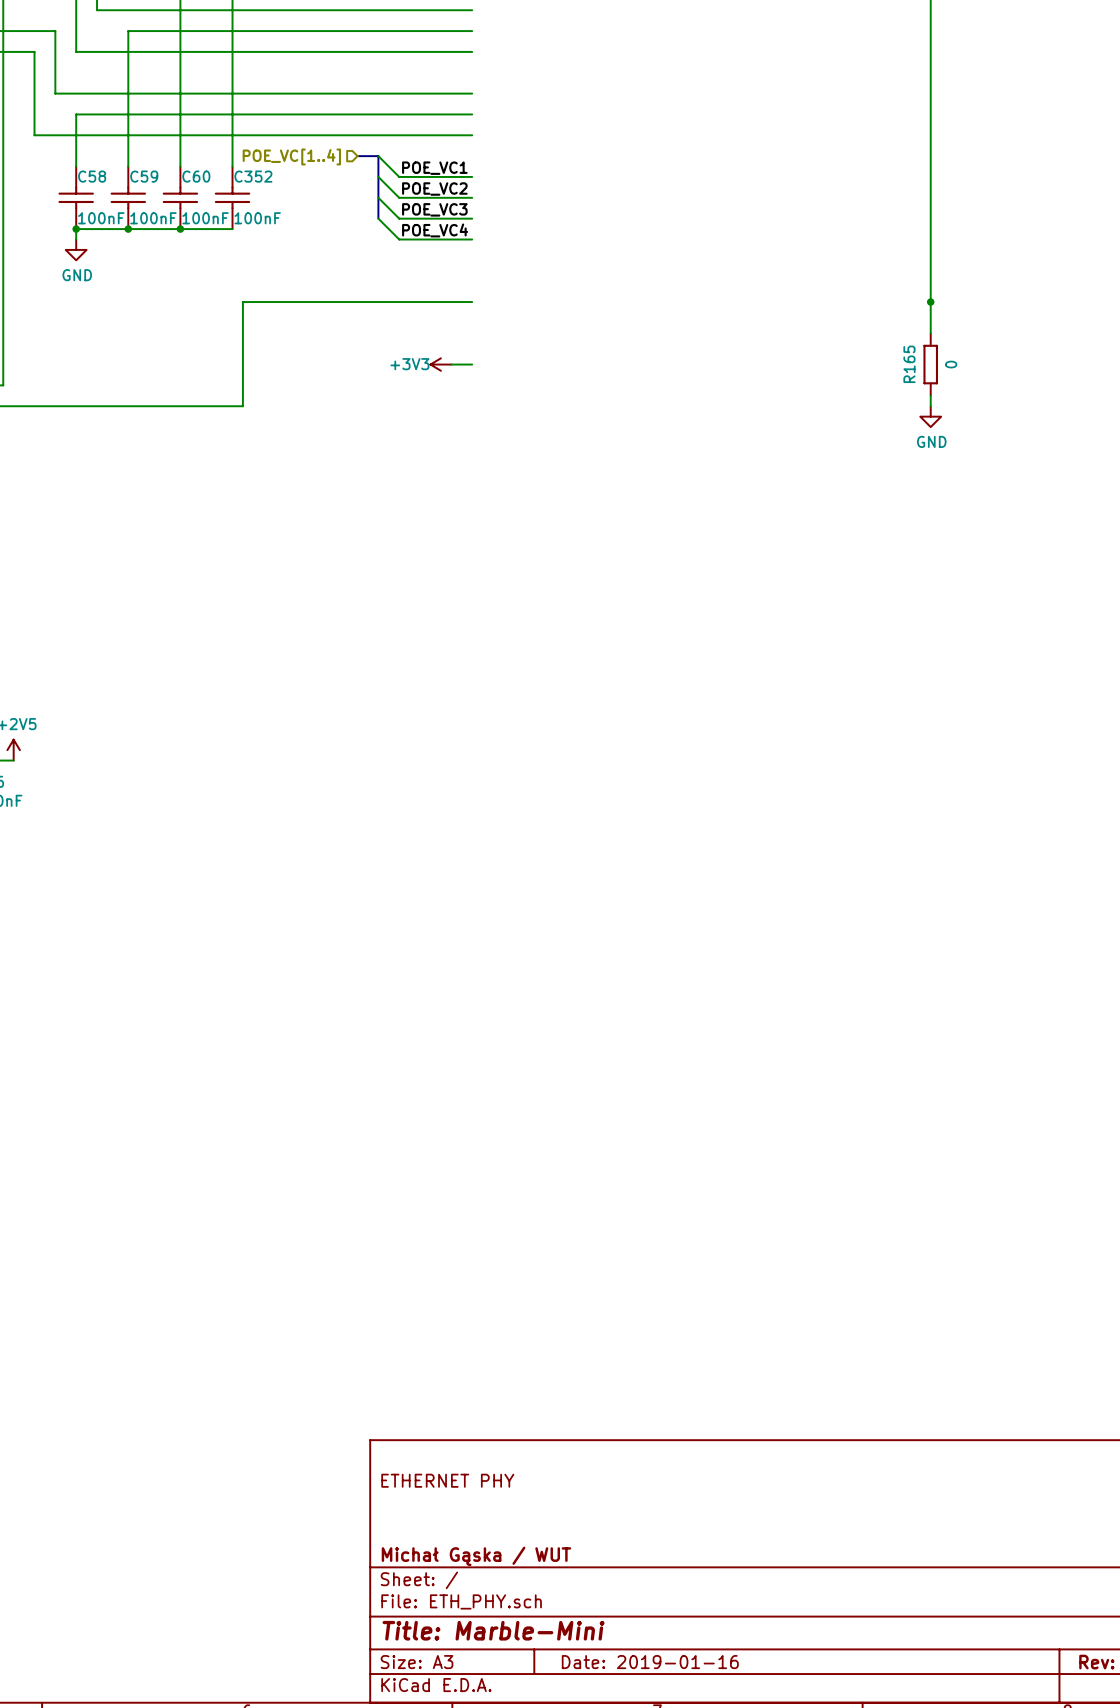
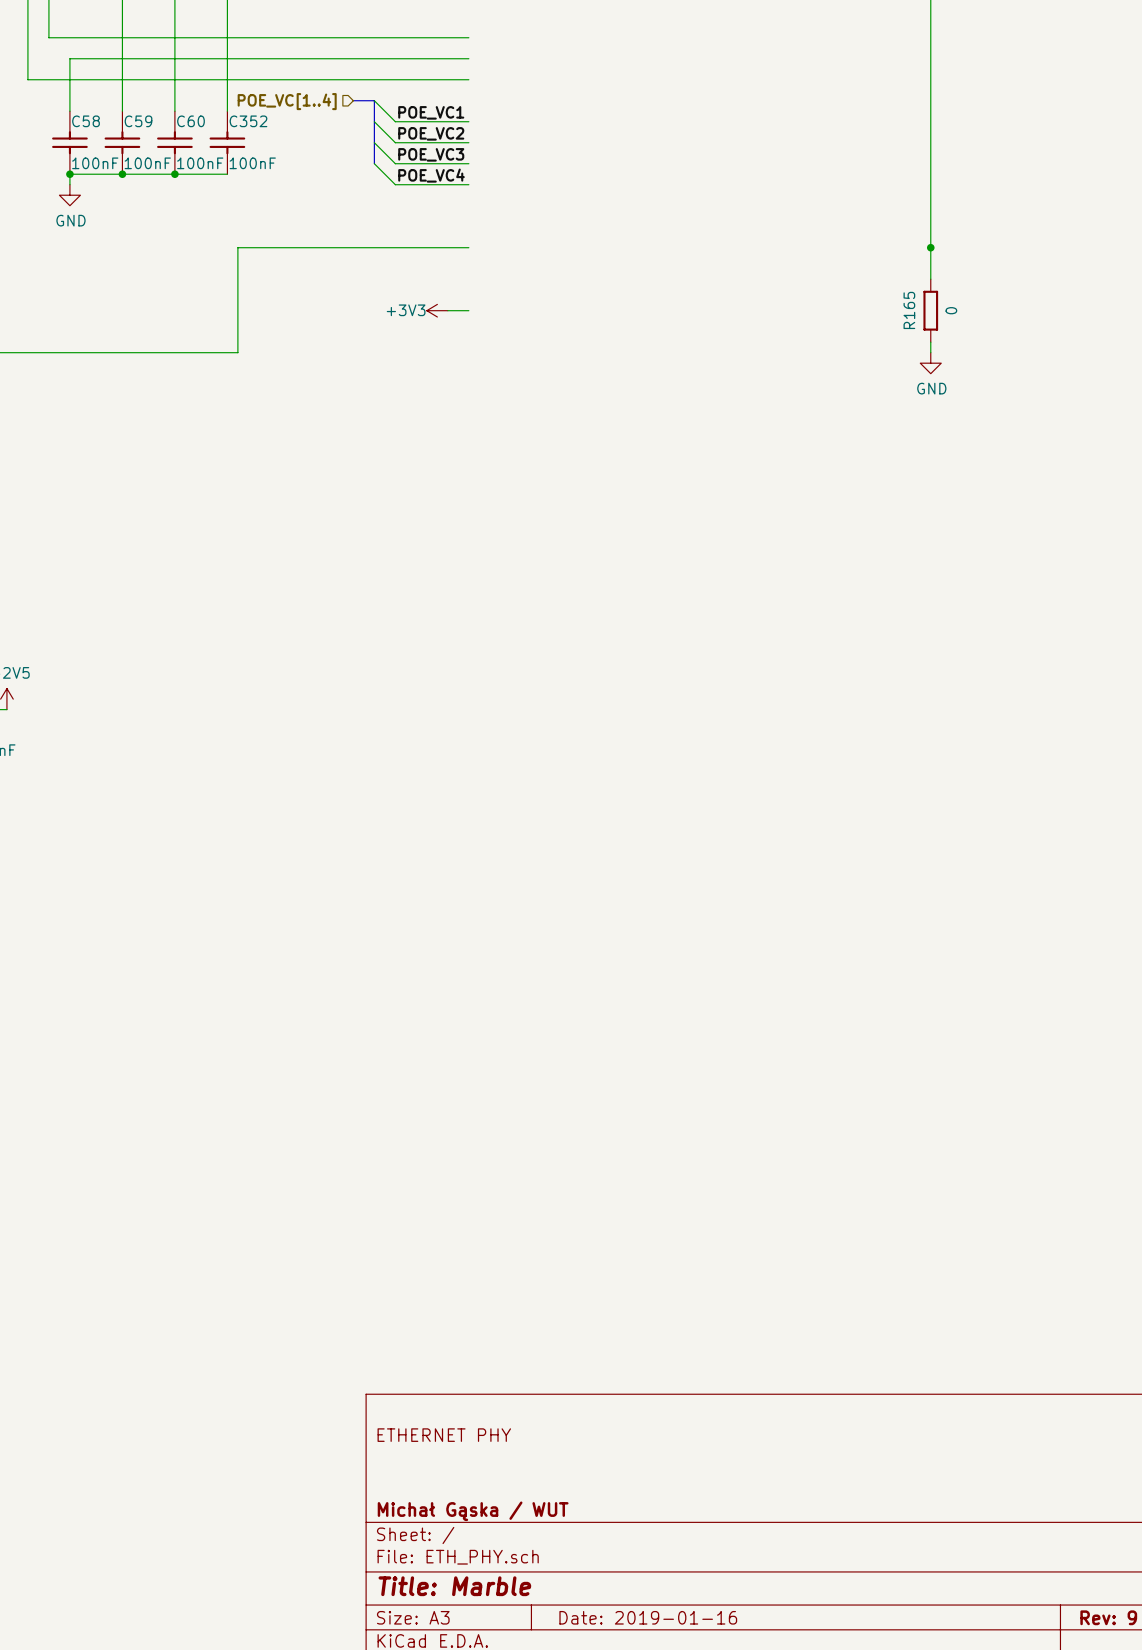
title block: Title: Marble-Mini (493, 1630) -> Title: Marble (454, 1586)

